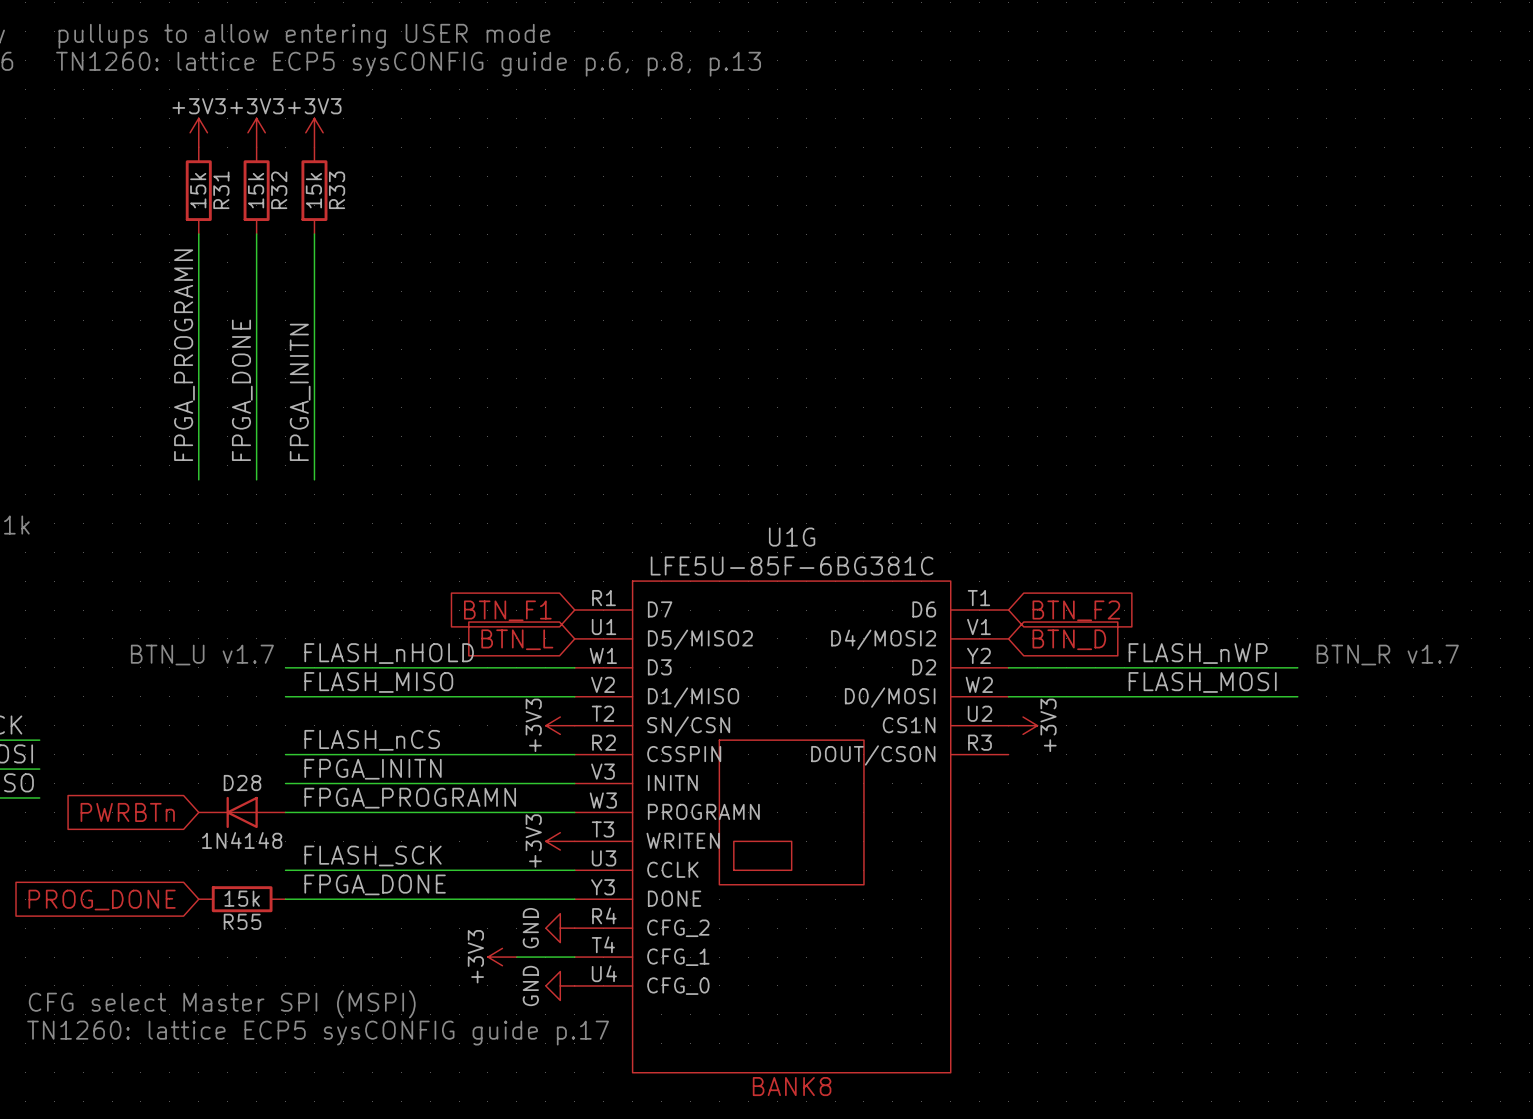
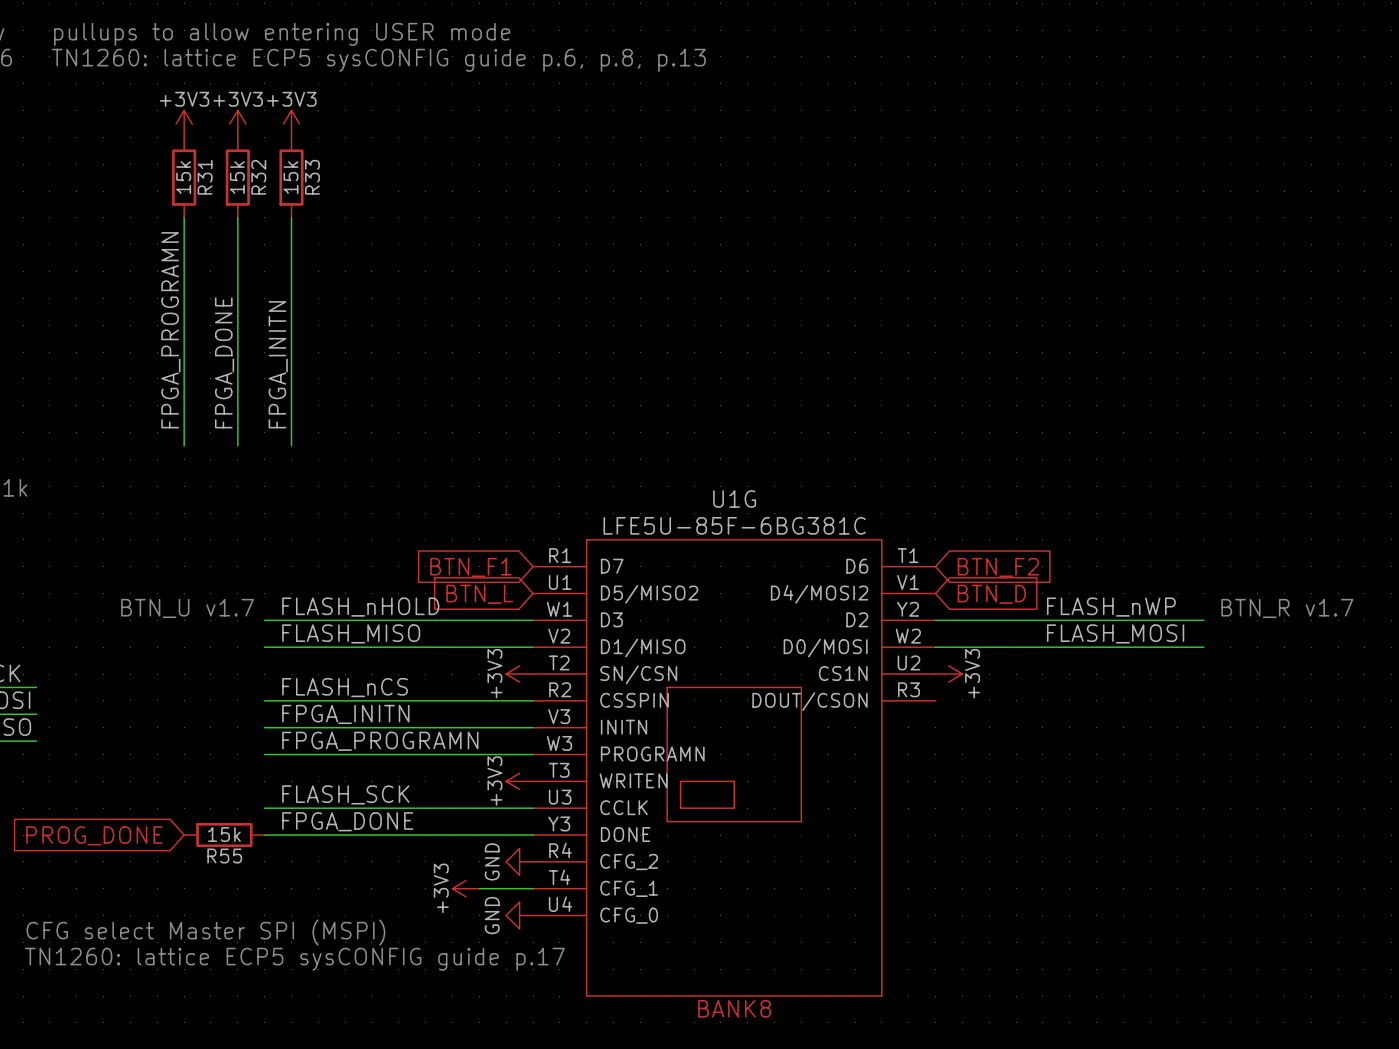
global label: PWRBTn (127, 812) -> none
D28: 1N4148 (242, 812) -> none

